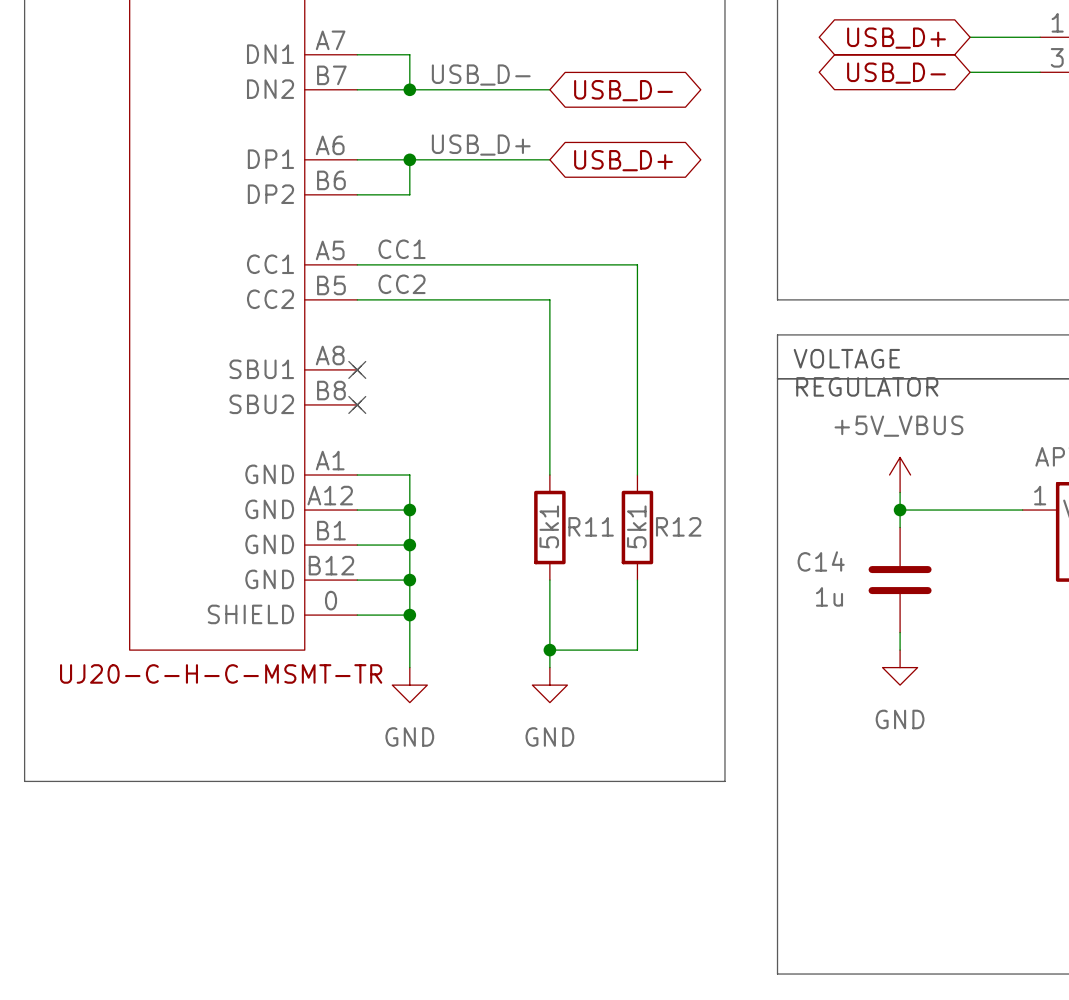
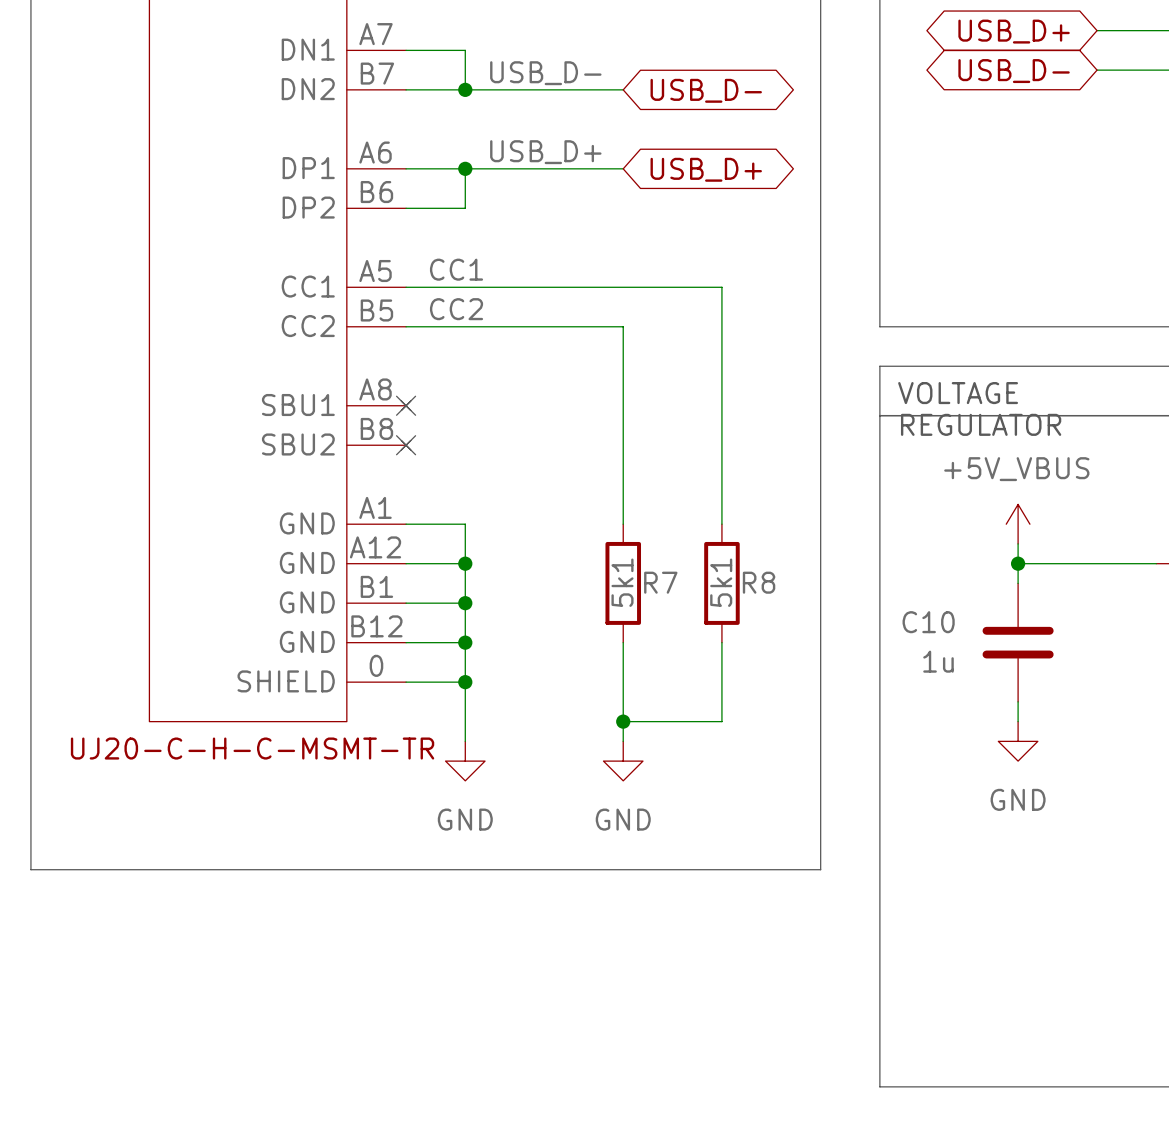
R11 name: R11 (591, 526) -> R7 (660, 582)
R12 name: R12 (678, 526) -> R8 (759, 582)
C14 name: C14 (821, 561) -> C10 (928, 622)

